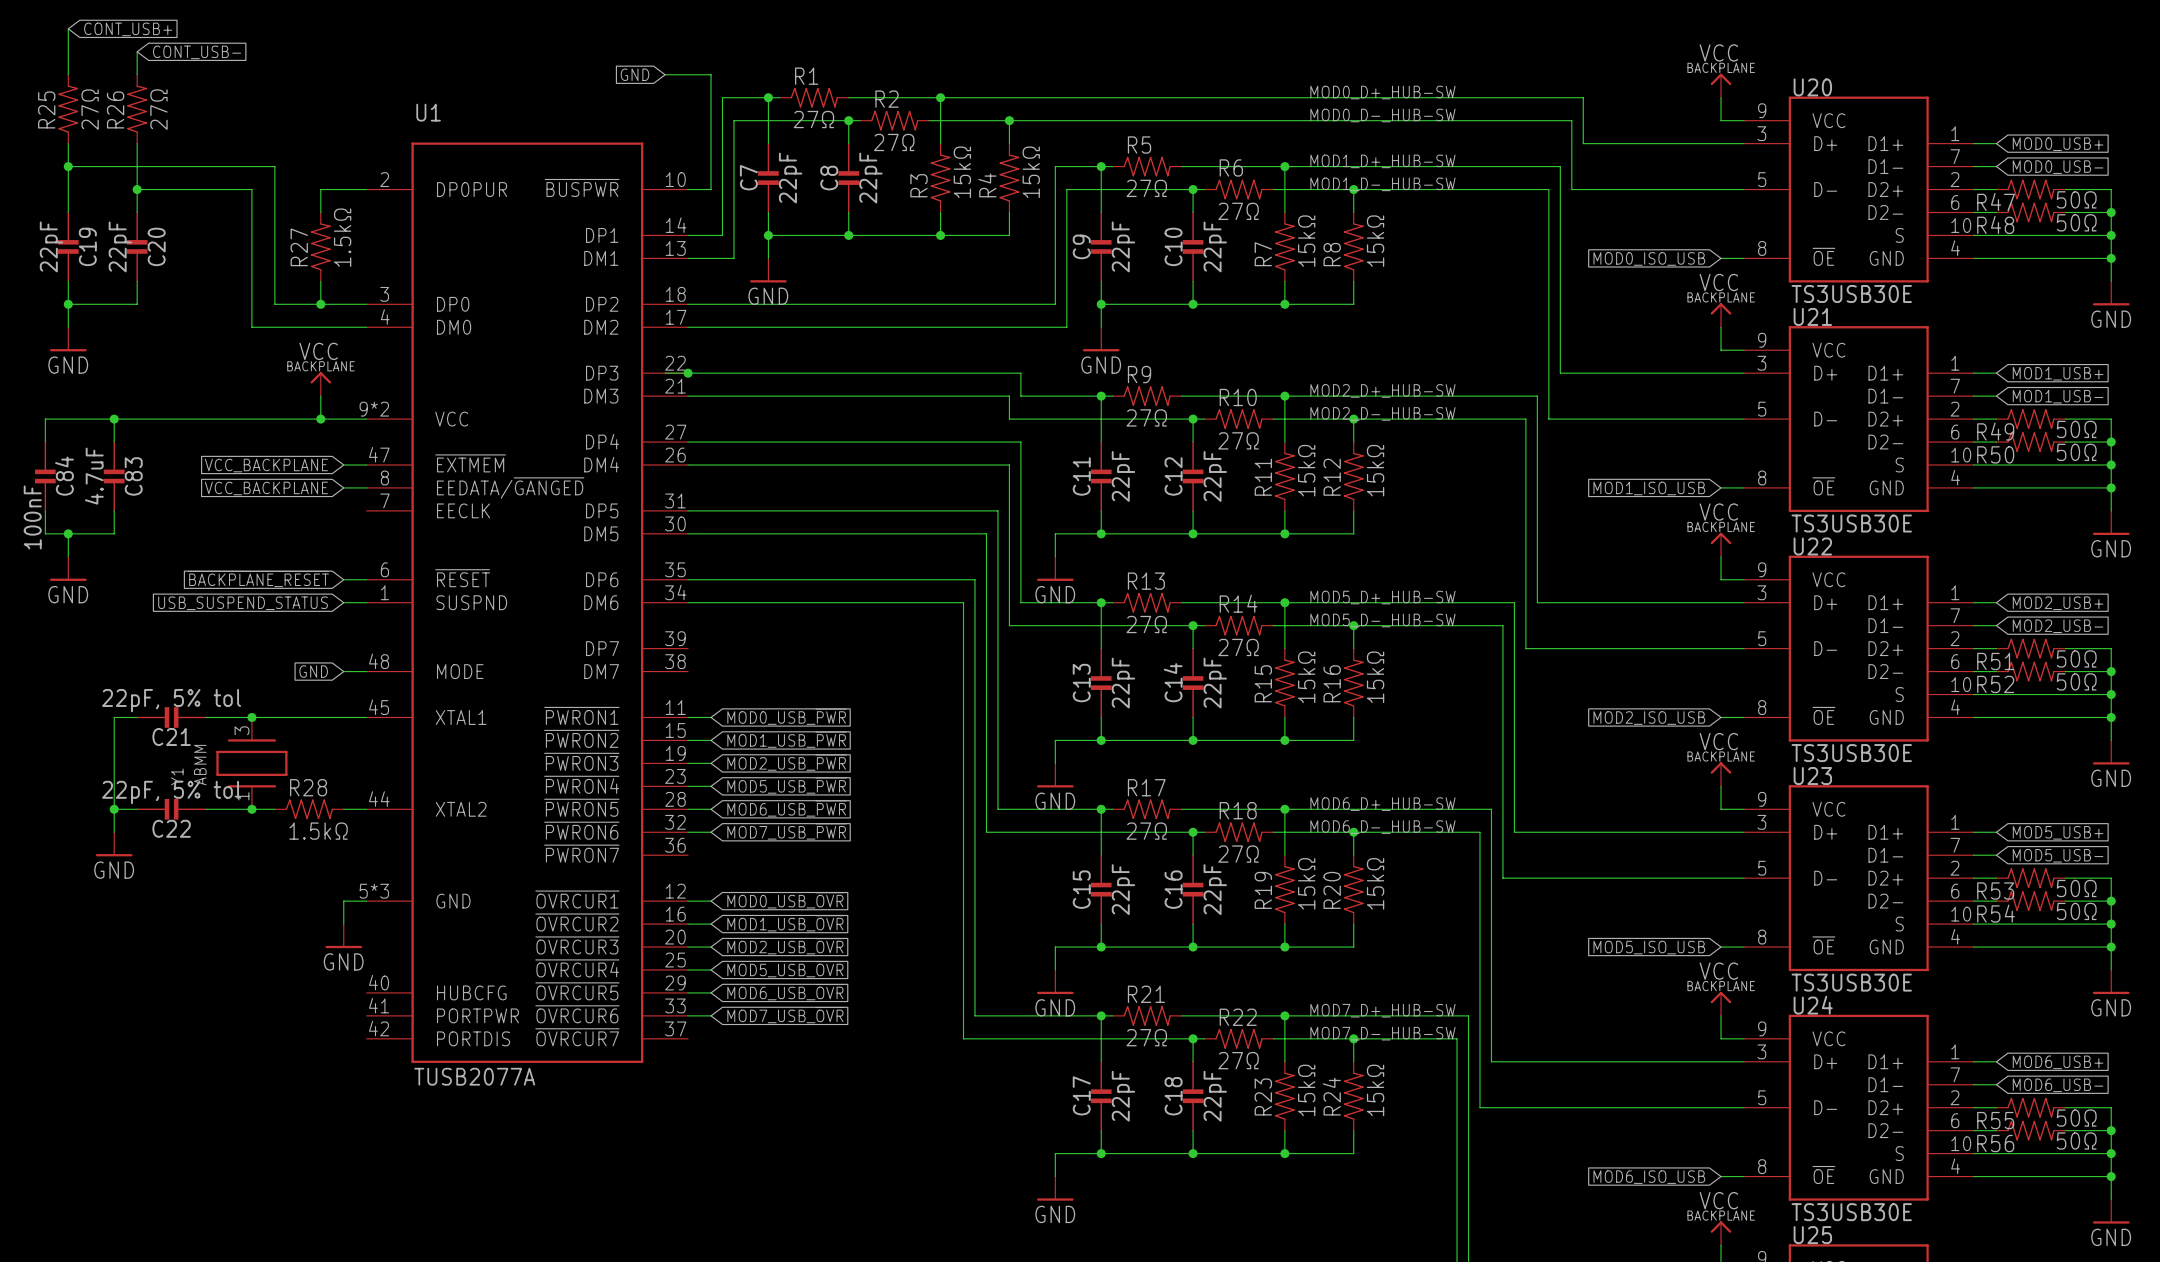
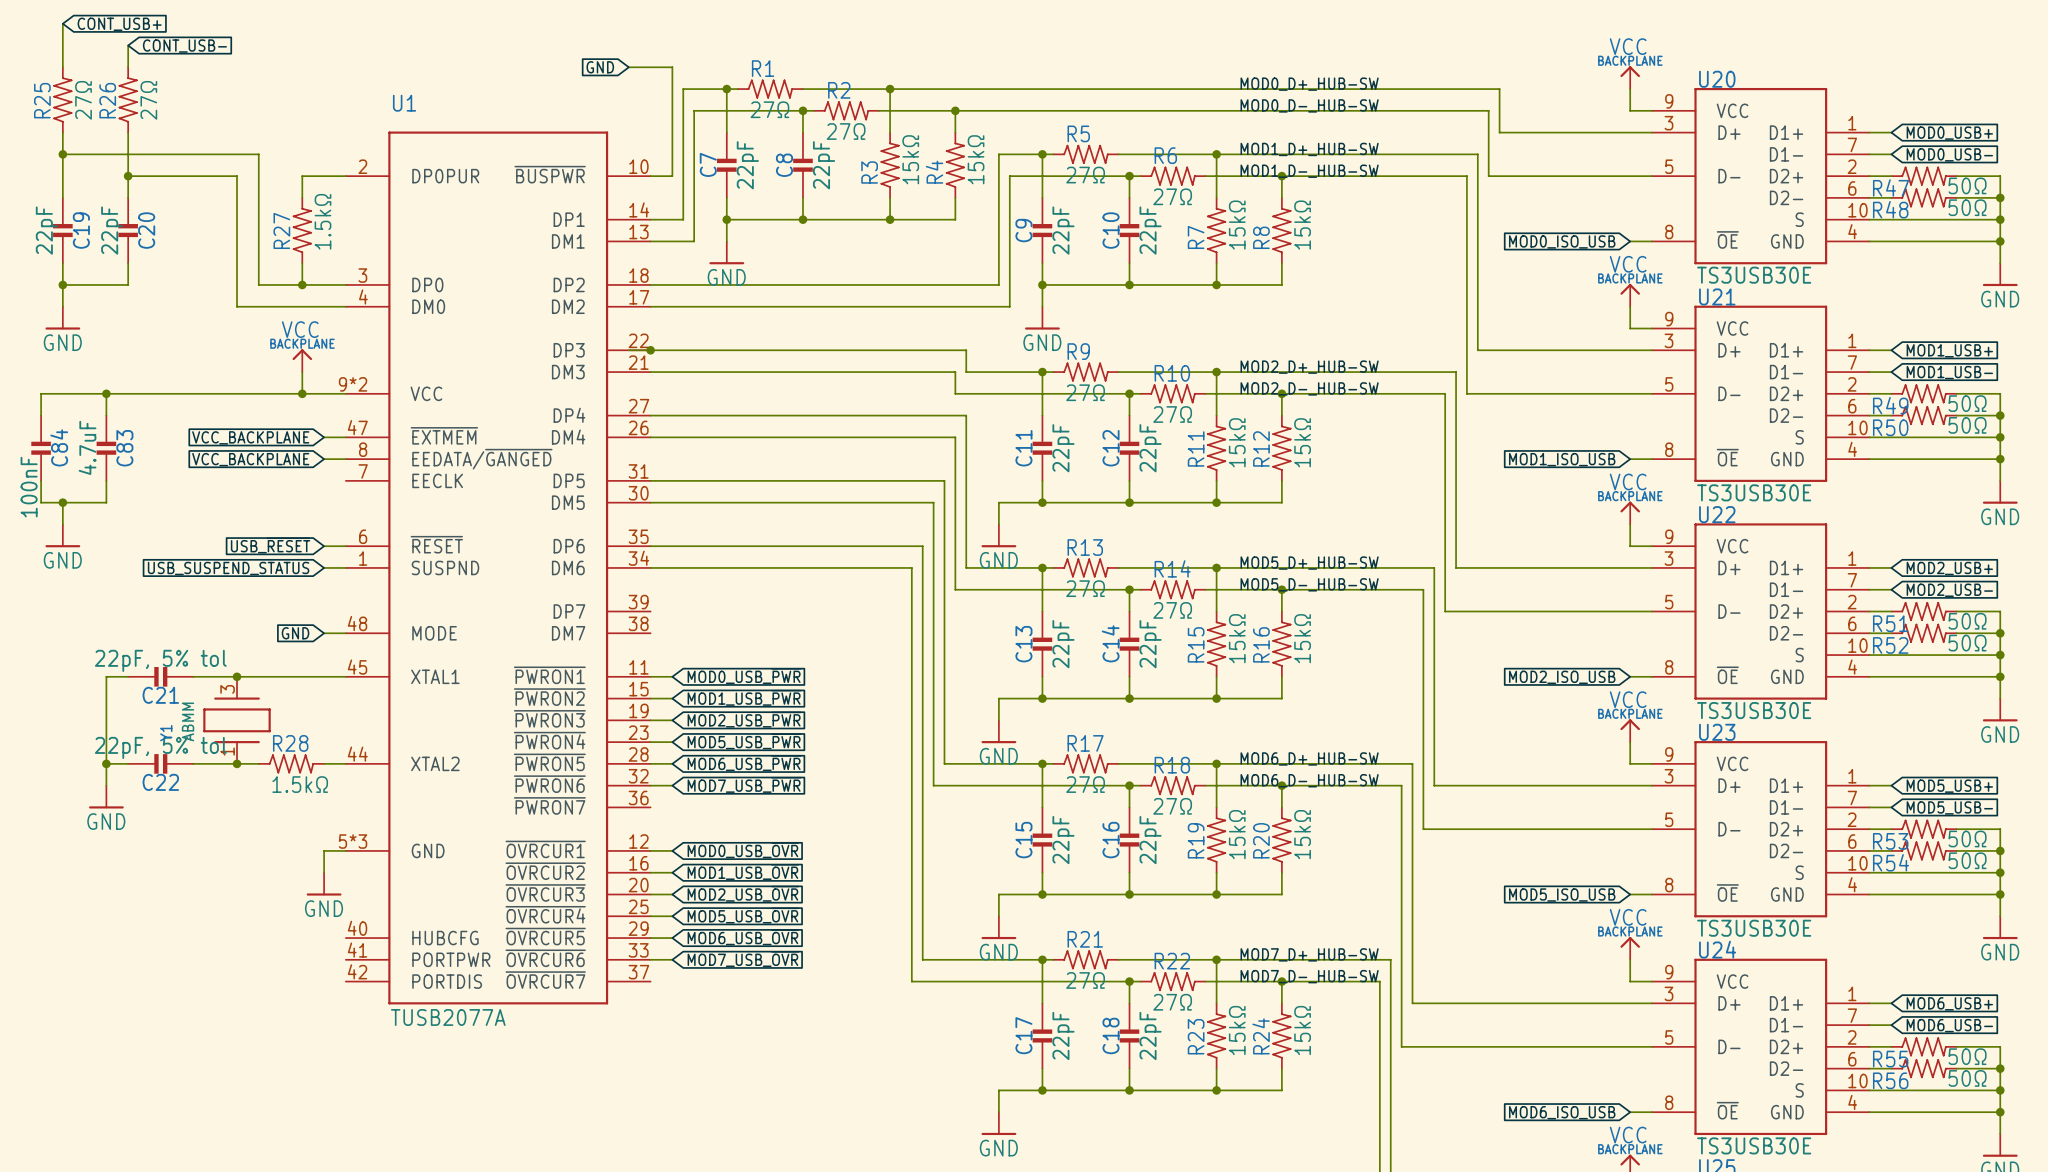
global label: ~{BACKPLANE_RESET} (258, 578) -> USB_~{RESET} (270, 545)

